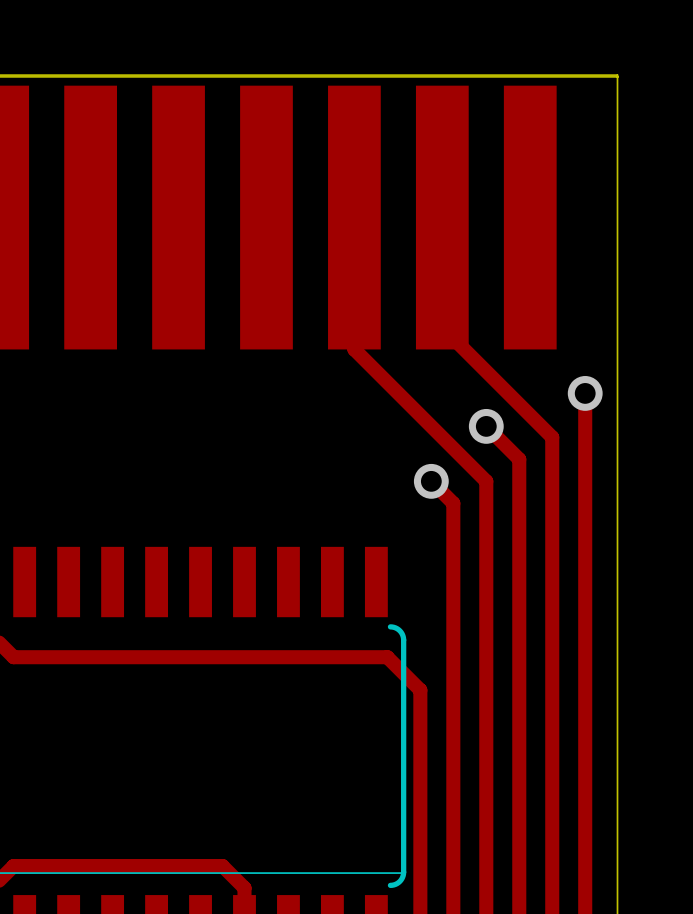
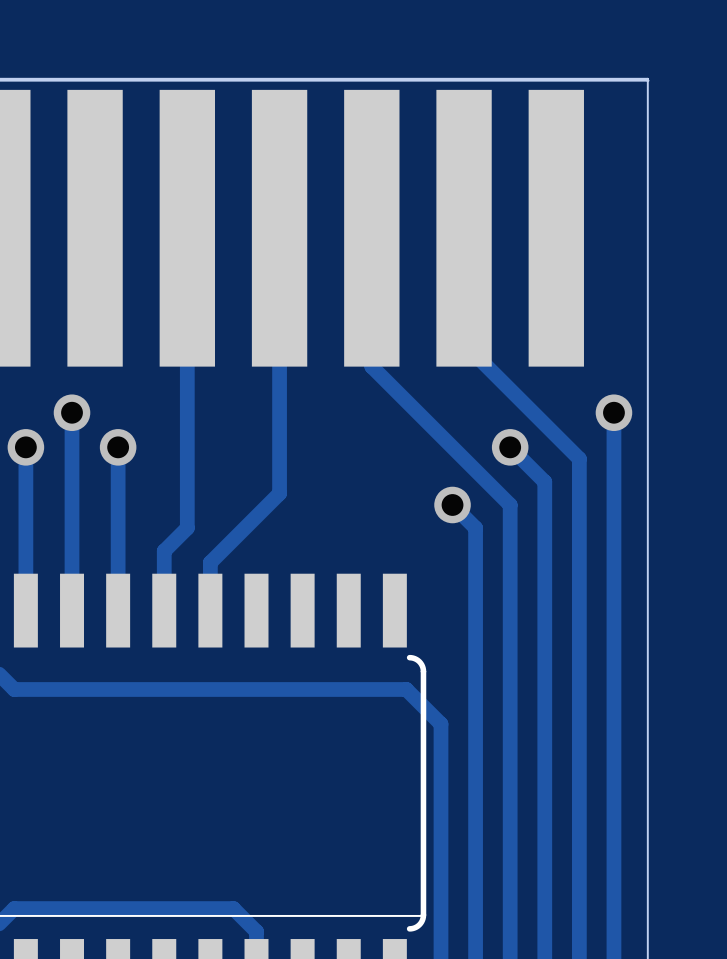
track: none -> (187, 228) (187, 528) (164, 551) (164, 610)
track: none -> (279, 228) (279, 493) (210, 562) (210, 610)
track: none -> (72, 412) (72, 610)
via: none -> (72, 412)
track: none -> (25, 447) (25, 610)
via: none -> (25, 447)
track: none -> (118, 447) (118, 610)
via: none -> (118, 447)

